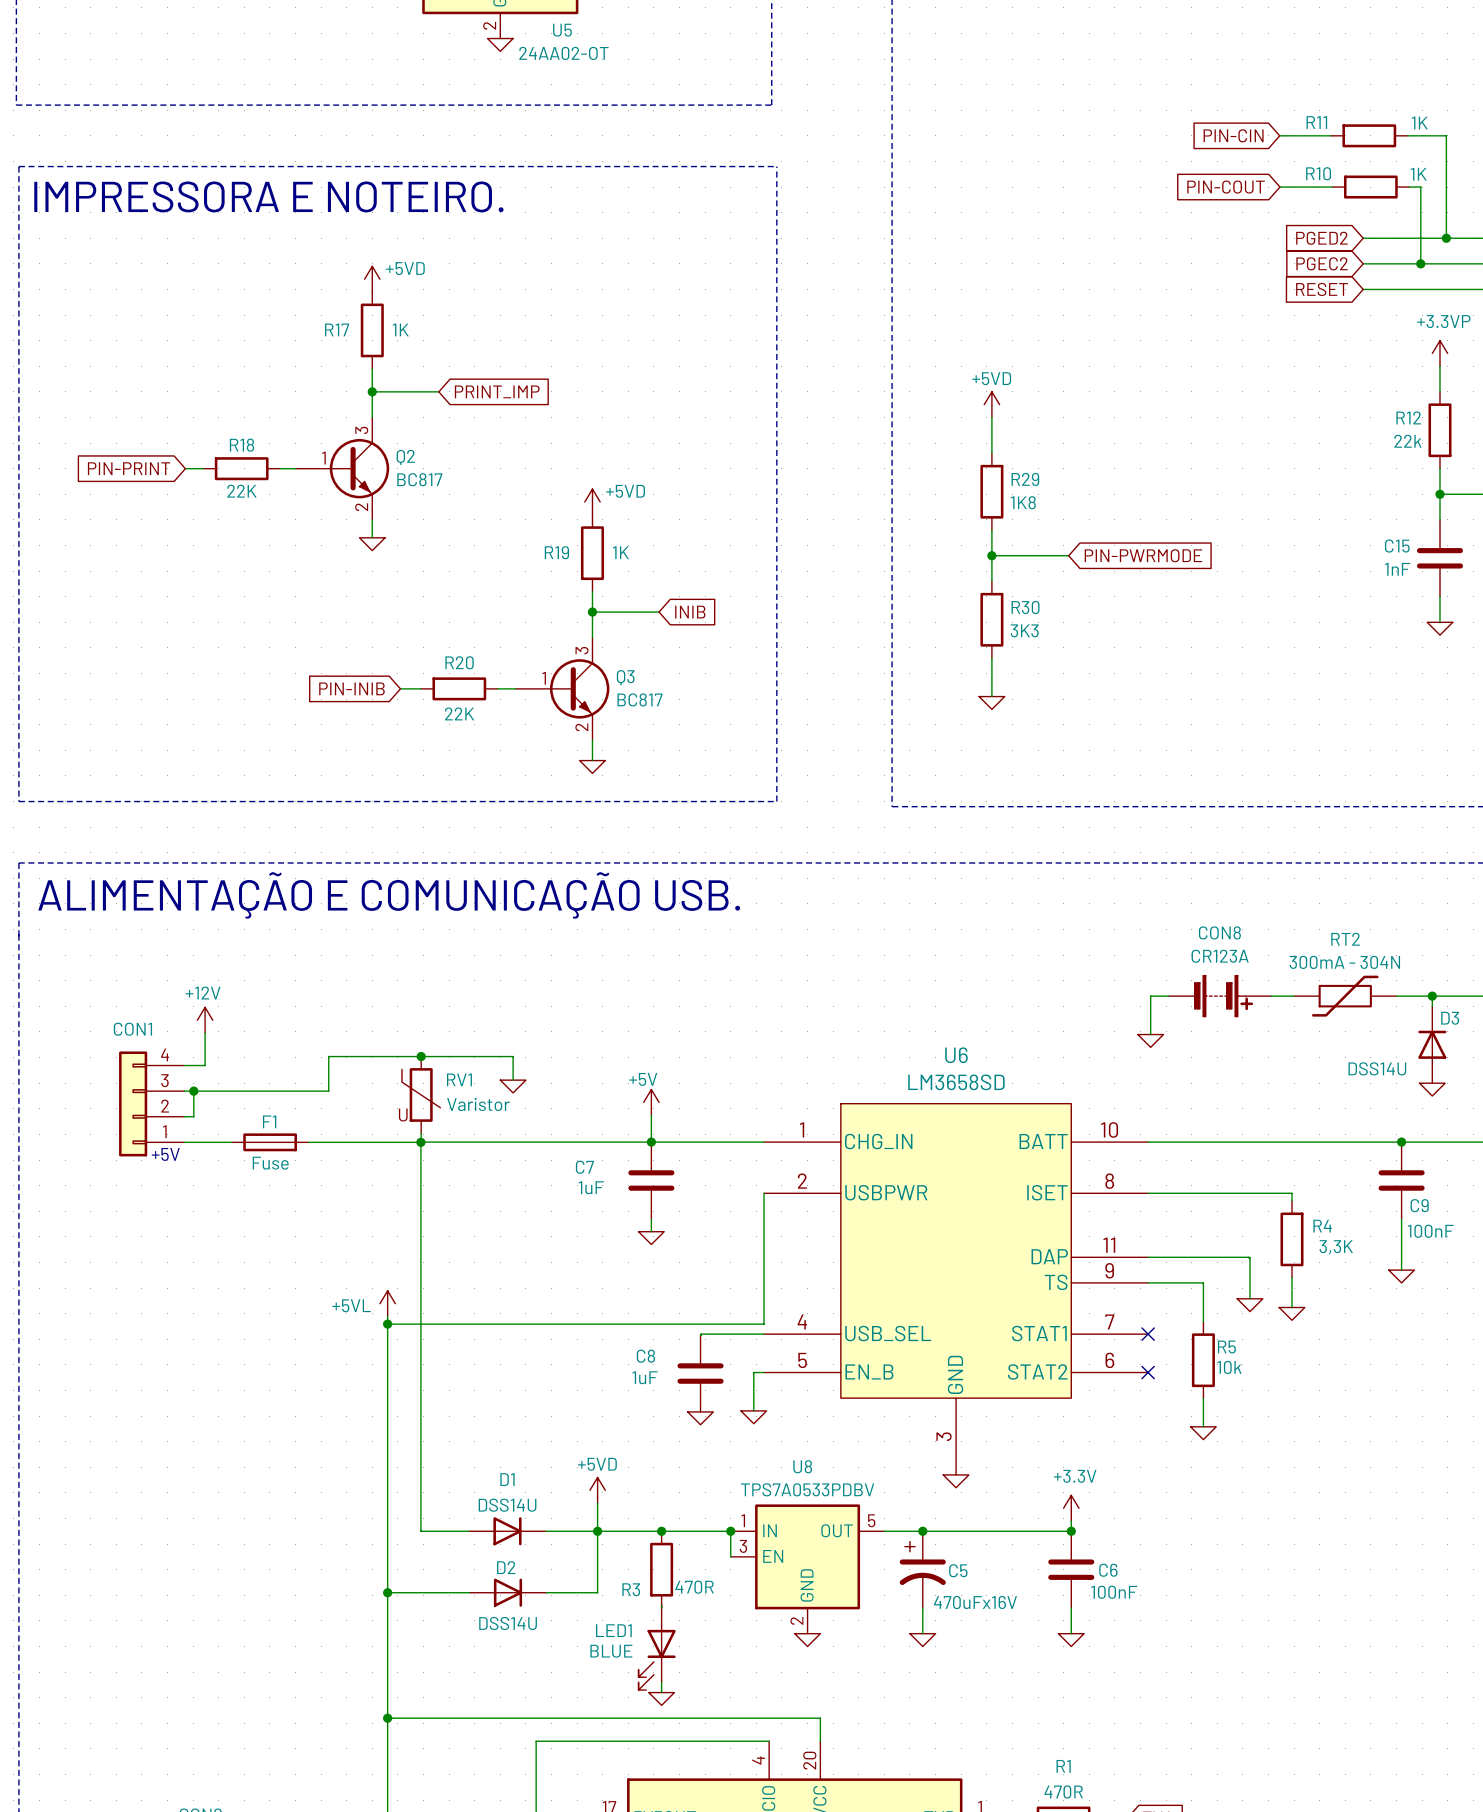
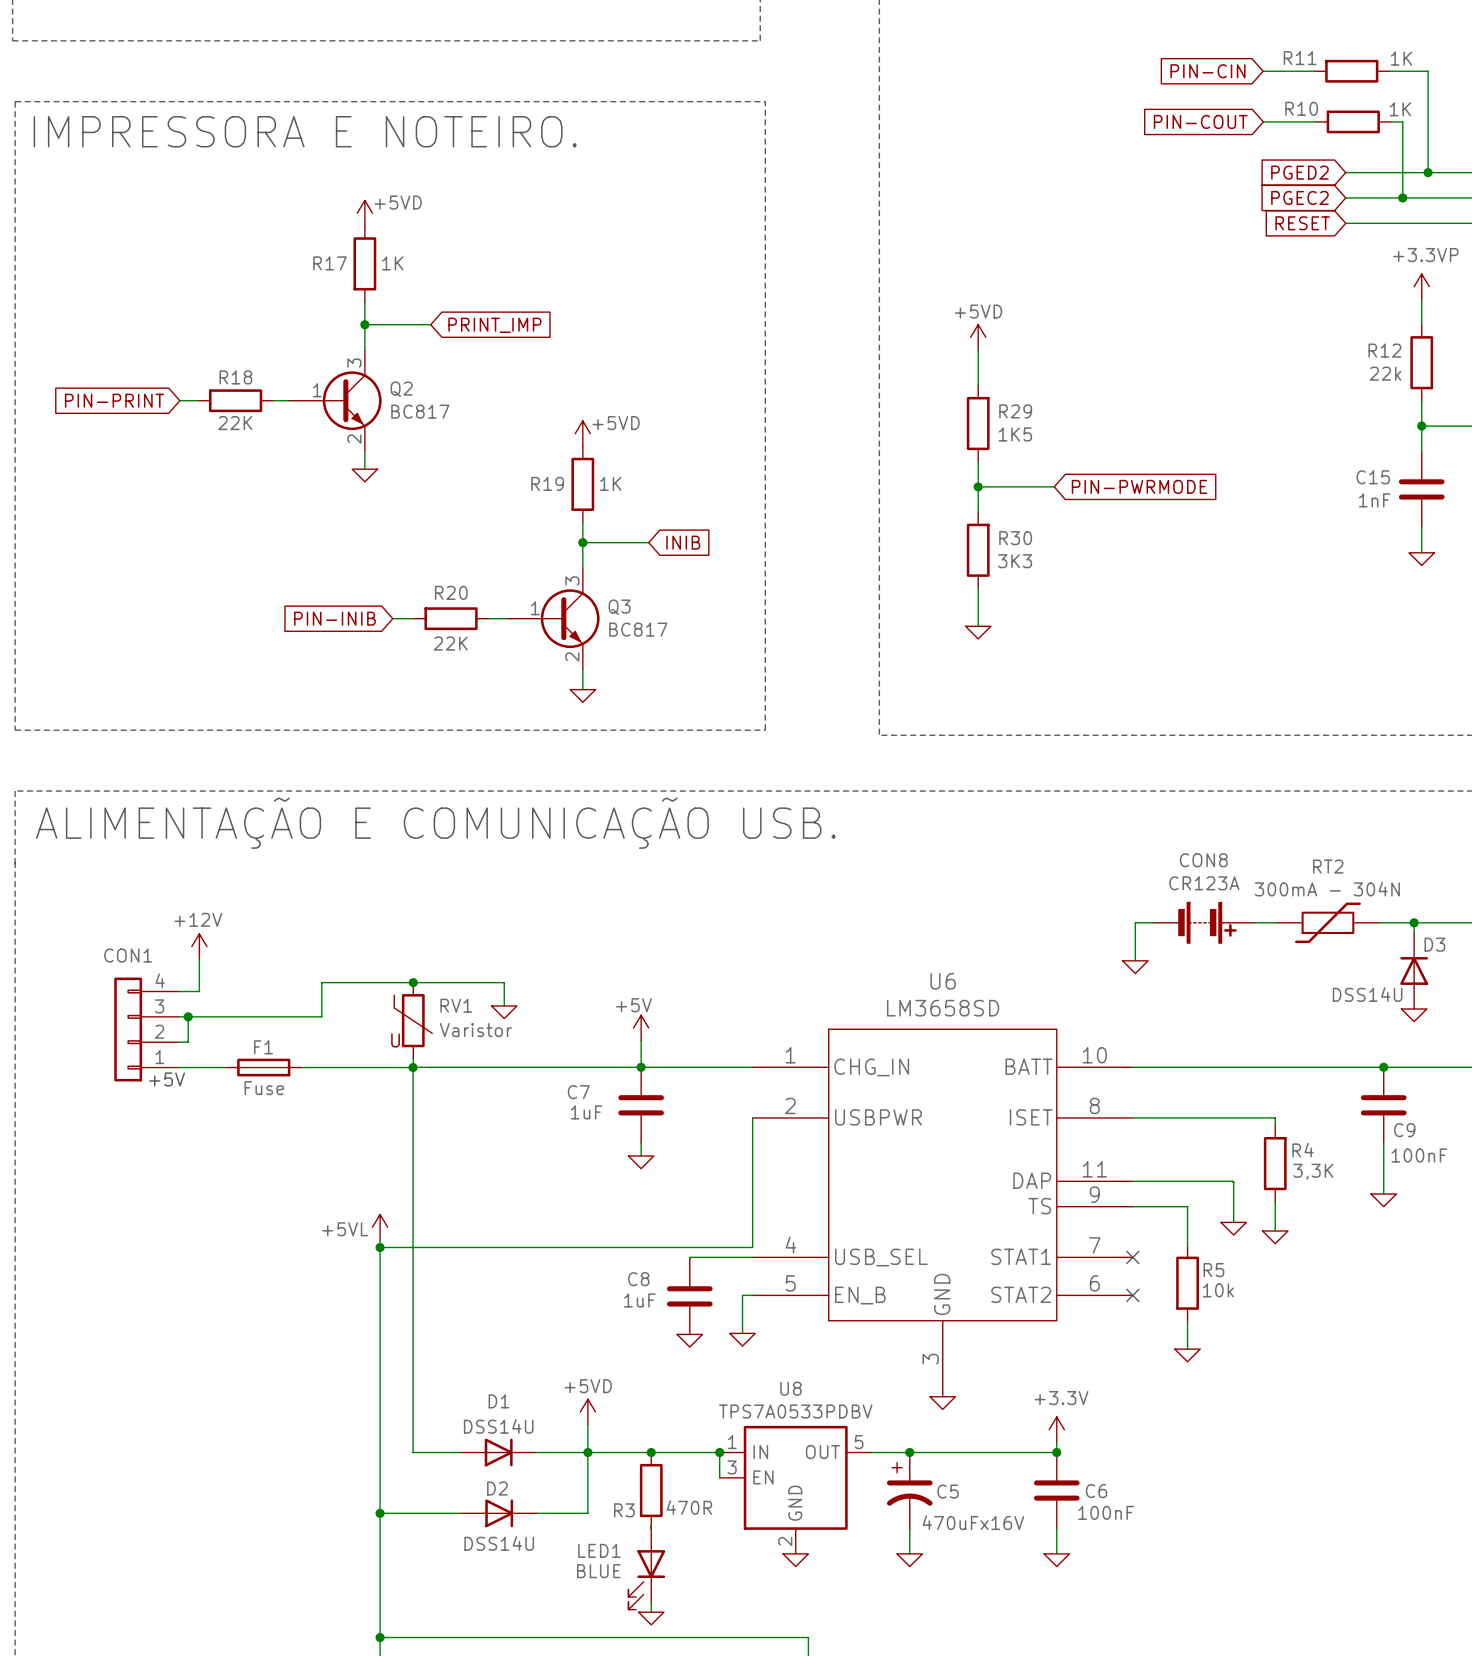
R29 value: 1K8 (1023, 502) -> 1K5 (1015, 434)

